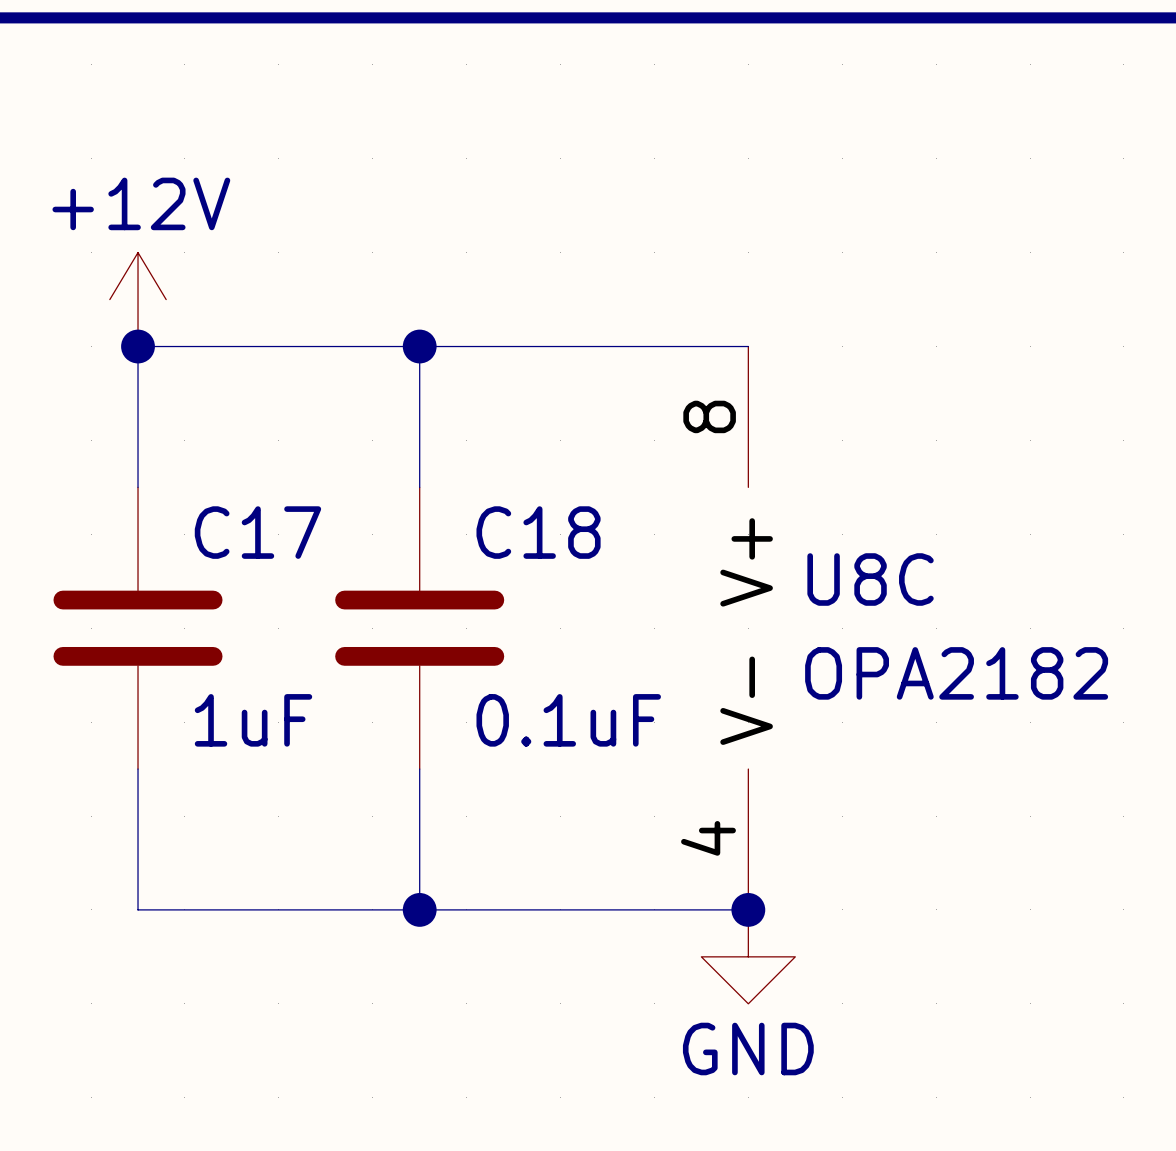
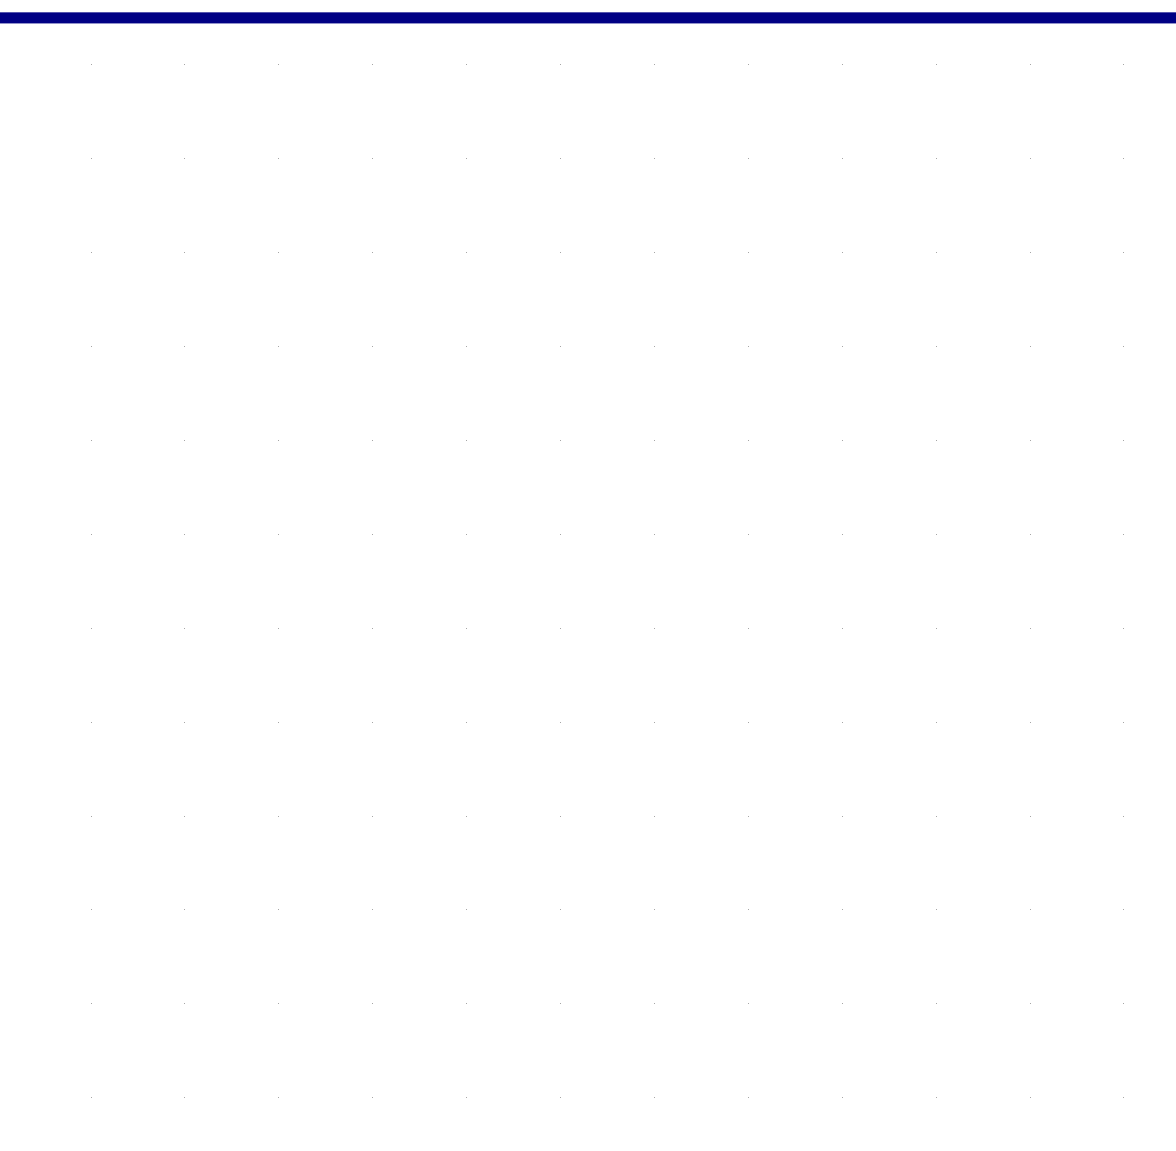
power symbol: +12V (138, 299) -> none
junction: (138, 346) -> none
wire: (419, 346) (419, 487) -> none
junction: (419, 346) -> none
wire: (748, 346) (138, 346) (138, 487) -> none
C17: 1uF (138, 628) -> none
C18: 0.1uF (419, 628) -> none
U8C: OPA2182 (748, 628) -> none
wire: (138, 769) (138, 909) (748, 909) -> none
wire: (419, 769) (419, 909) -> none
junction: (419, 909) -> none
junction: (748, 909) -> none
power symbol: GND (748, 956) -> none

